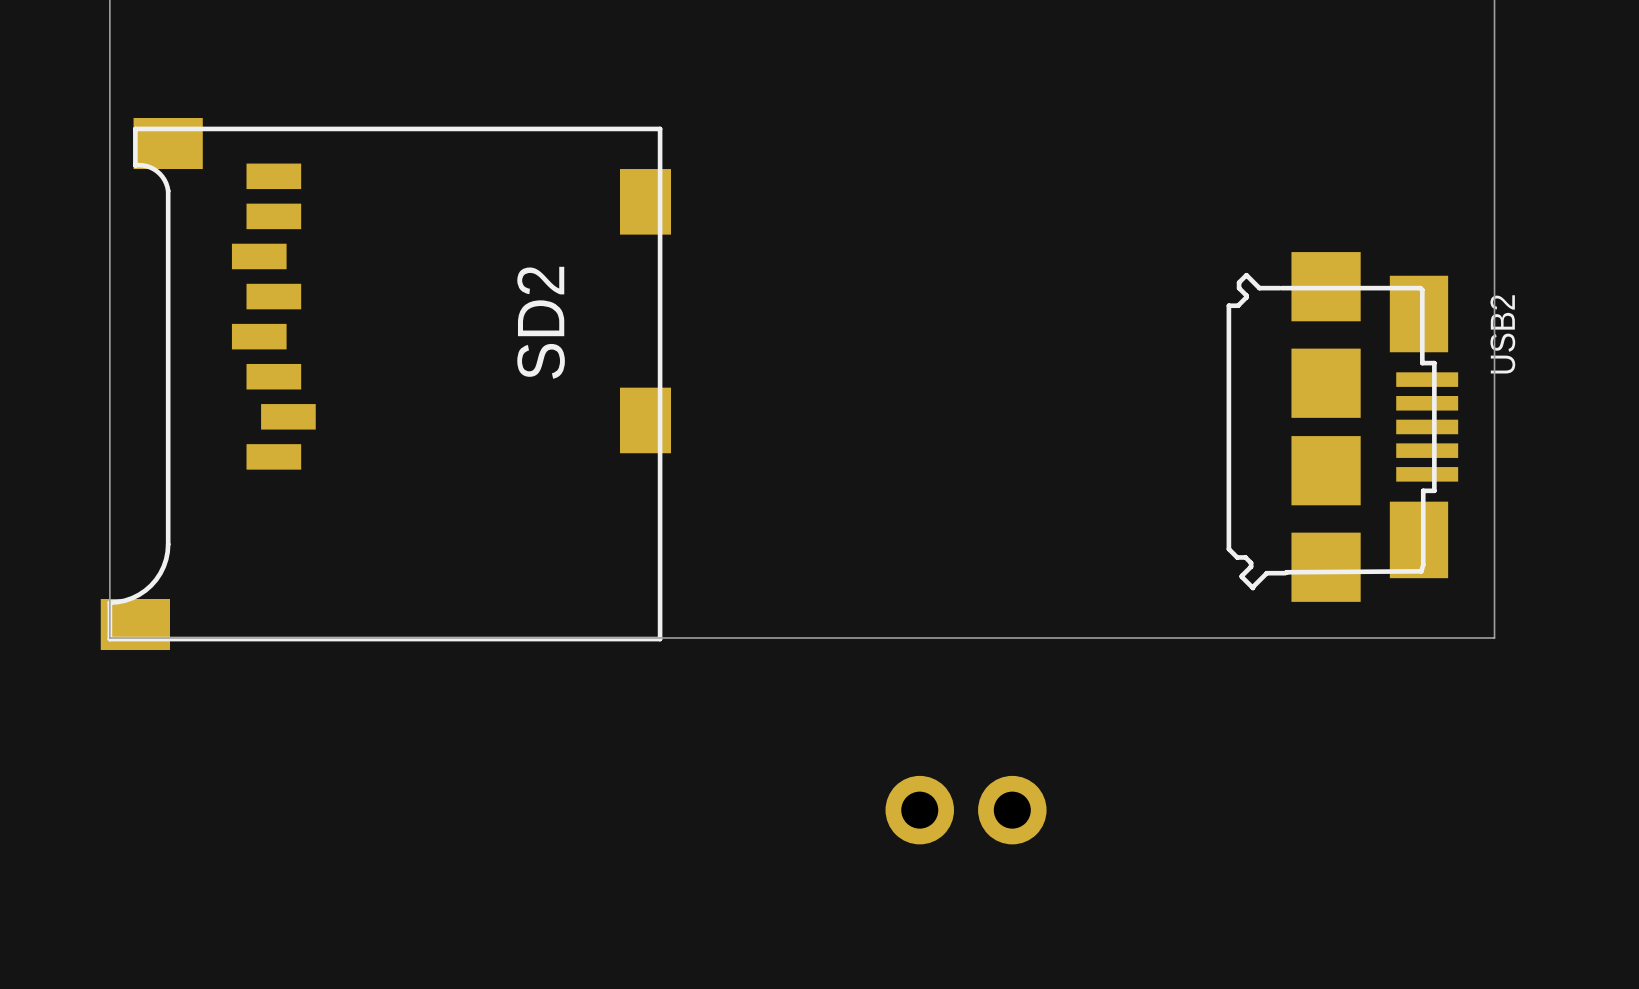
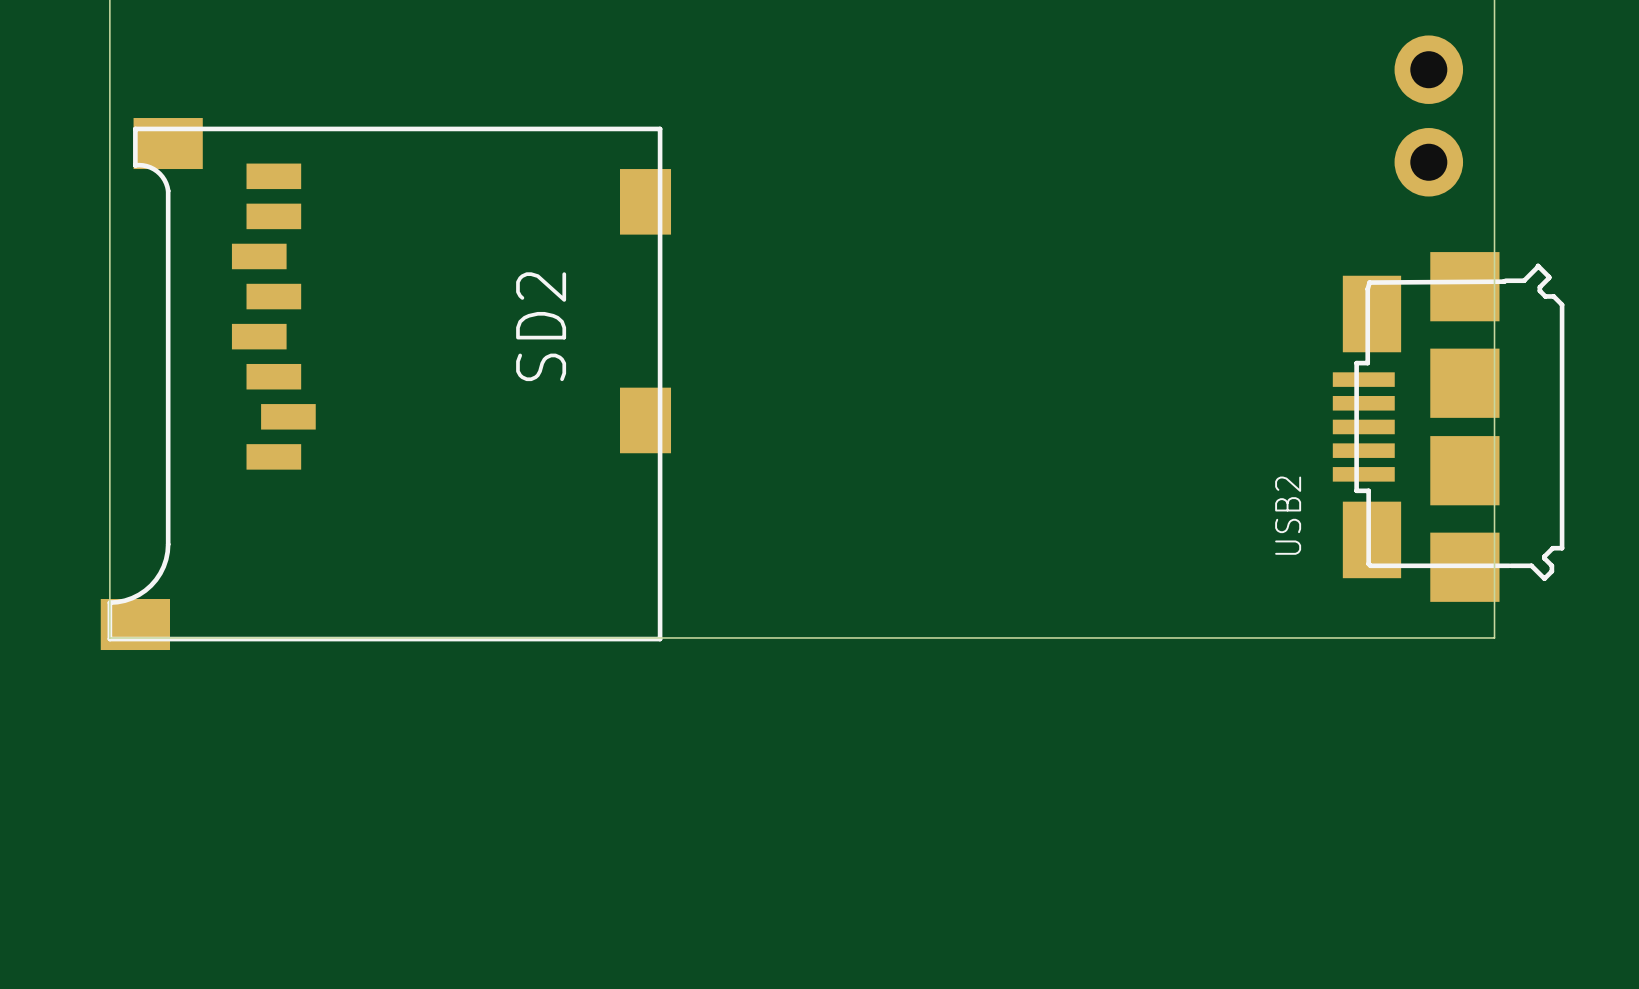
USB2 rotation: 0° (1342, 426) -> 180° (1448, 426)
part rotation: 0° (966, 810) -> 90° clockwise (1428, 115)
part position: (966, 810) -> (1428, 115)

